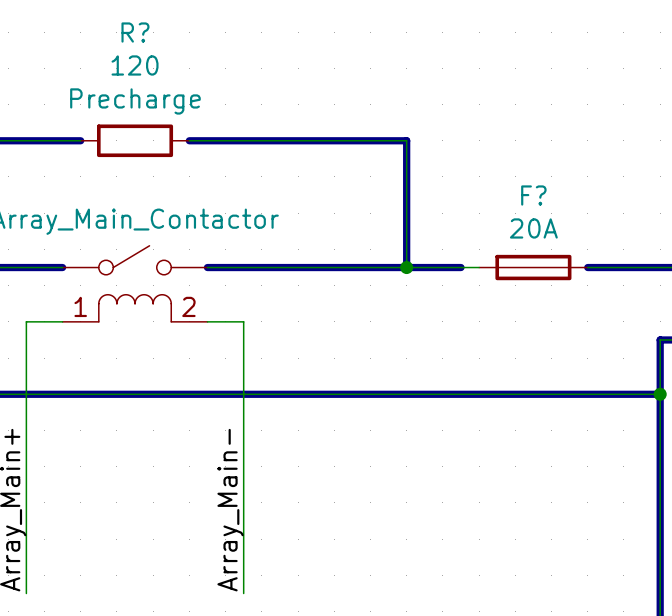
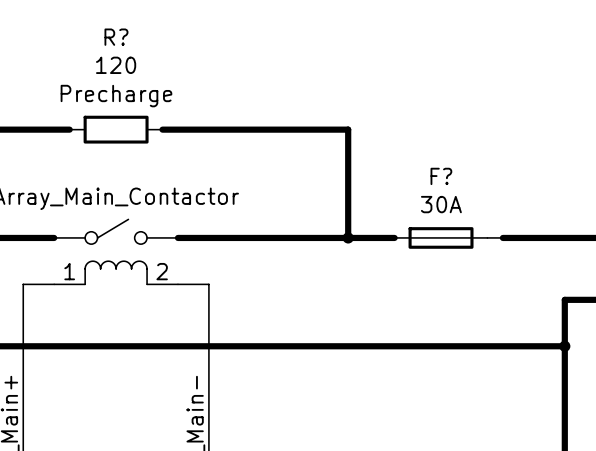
F?: none -> 30A (441, 237)
F?: 20A (533, 267) -> none

